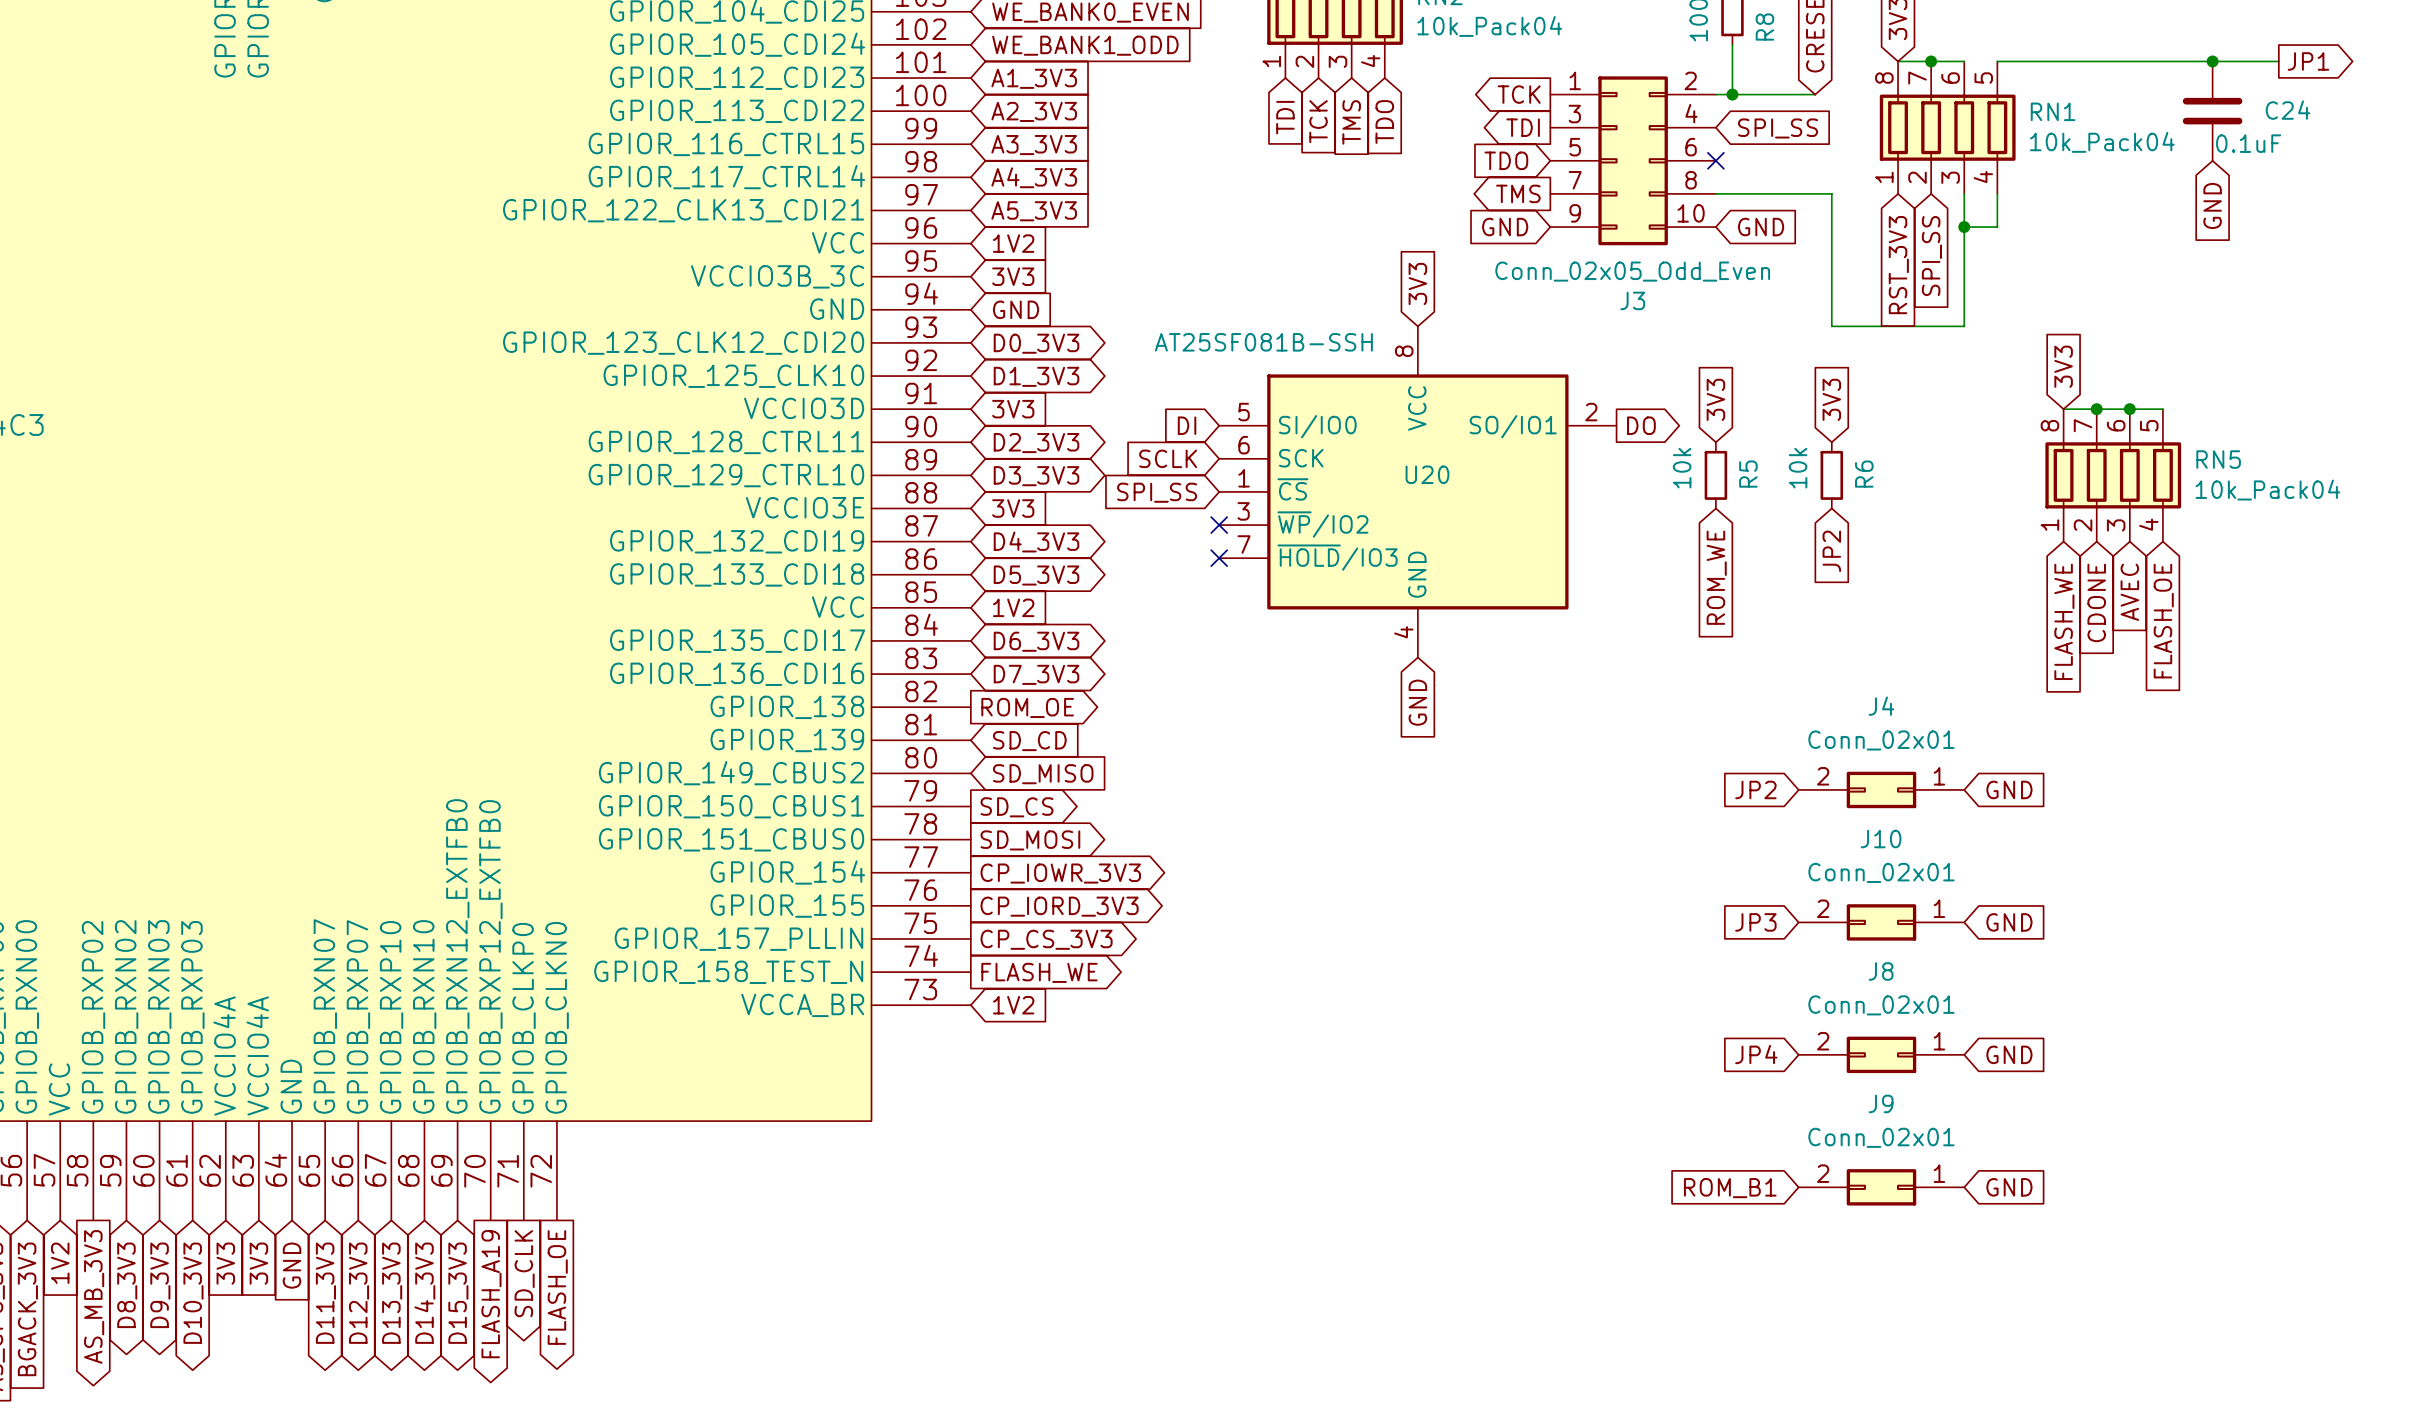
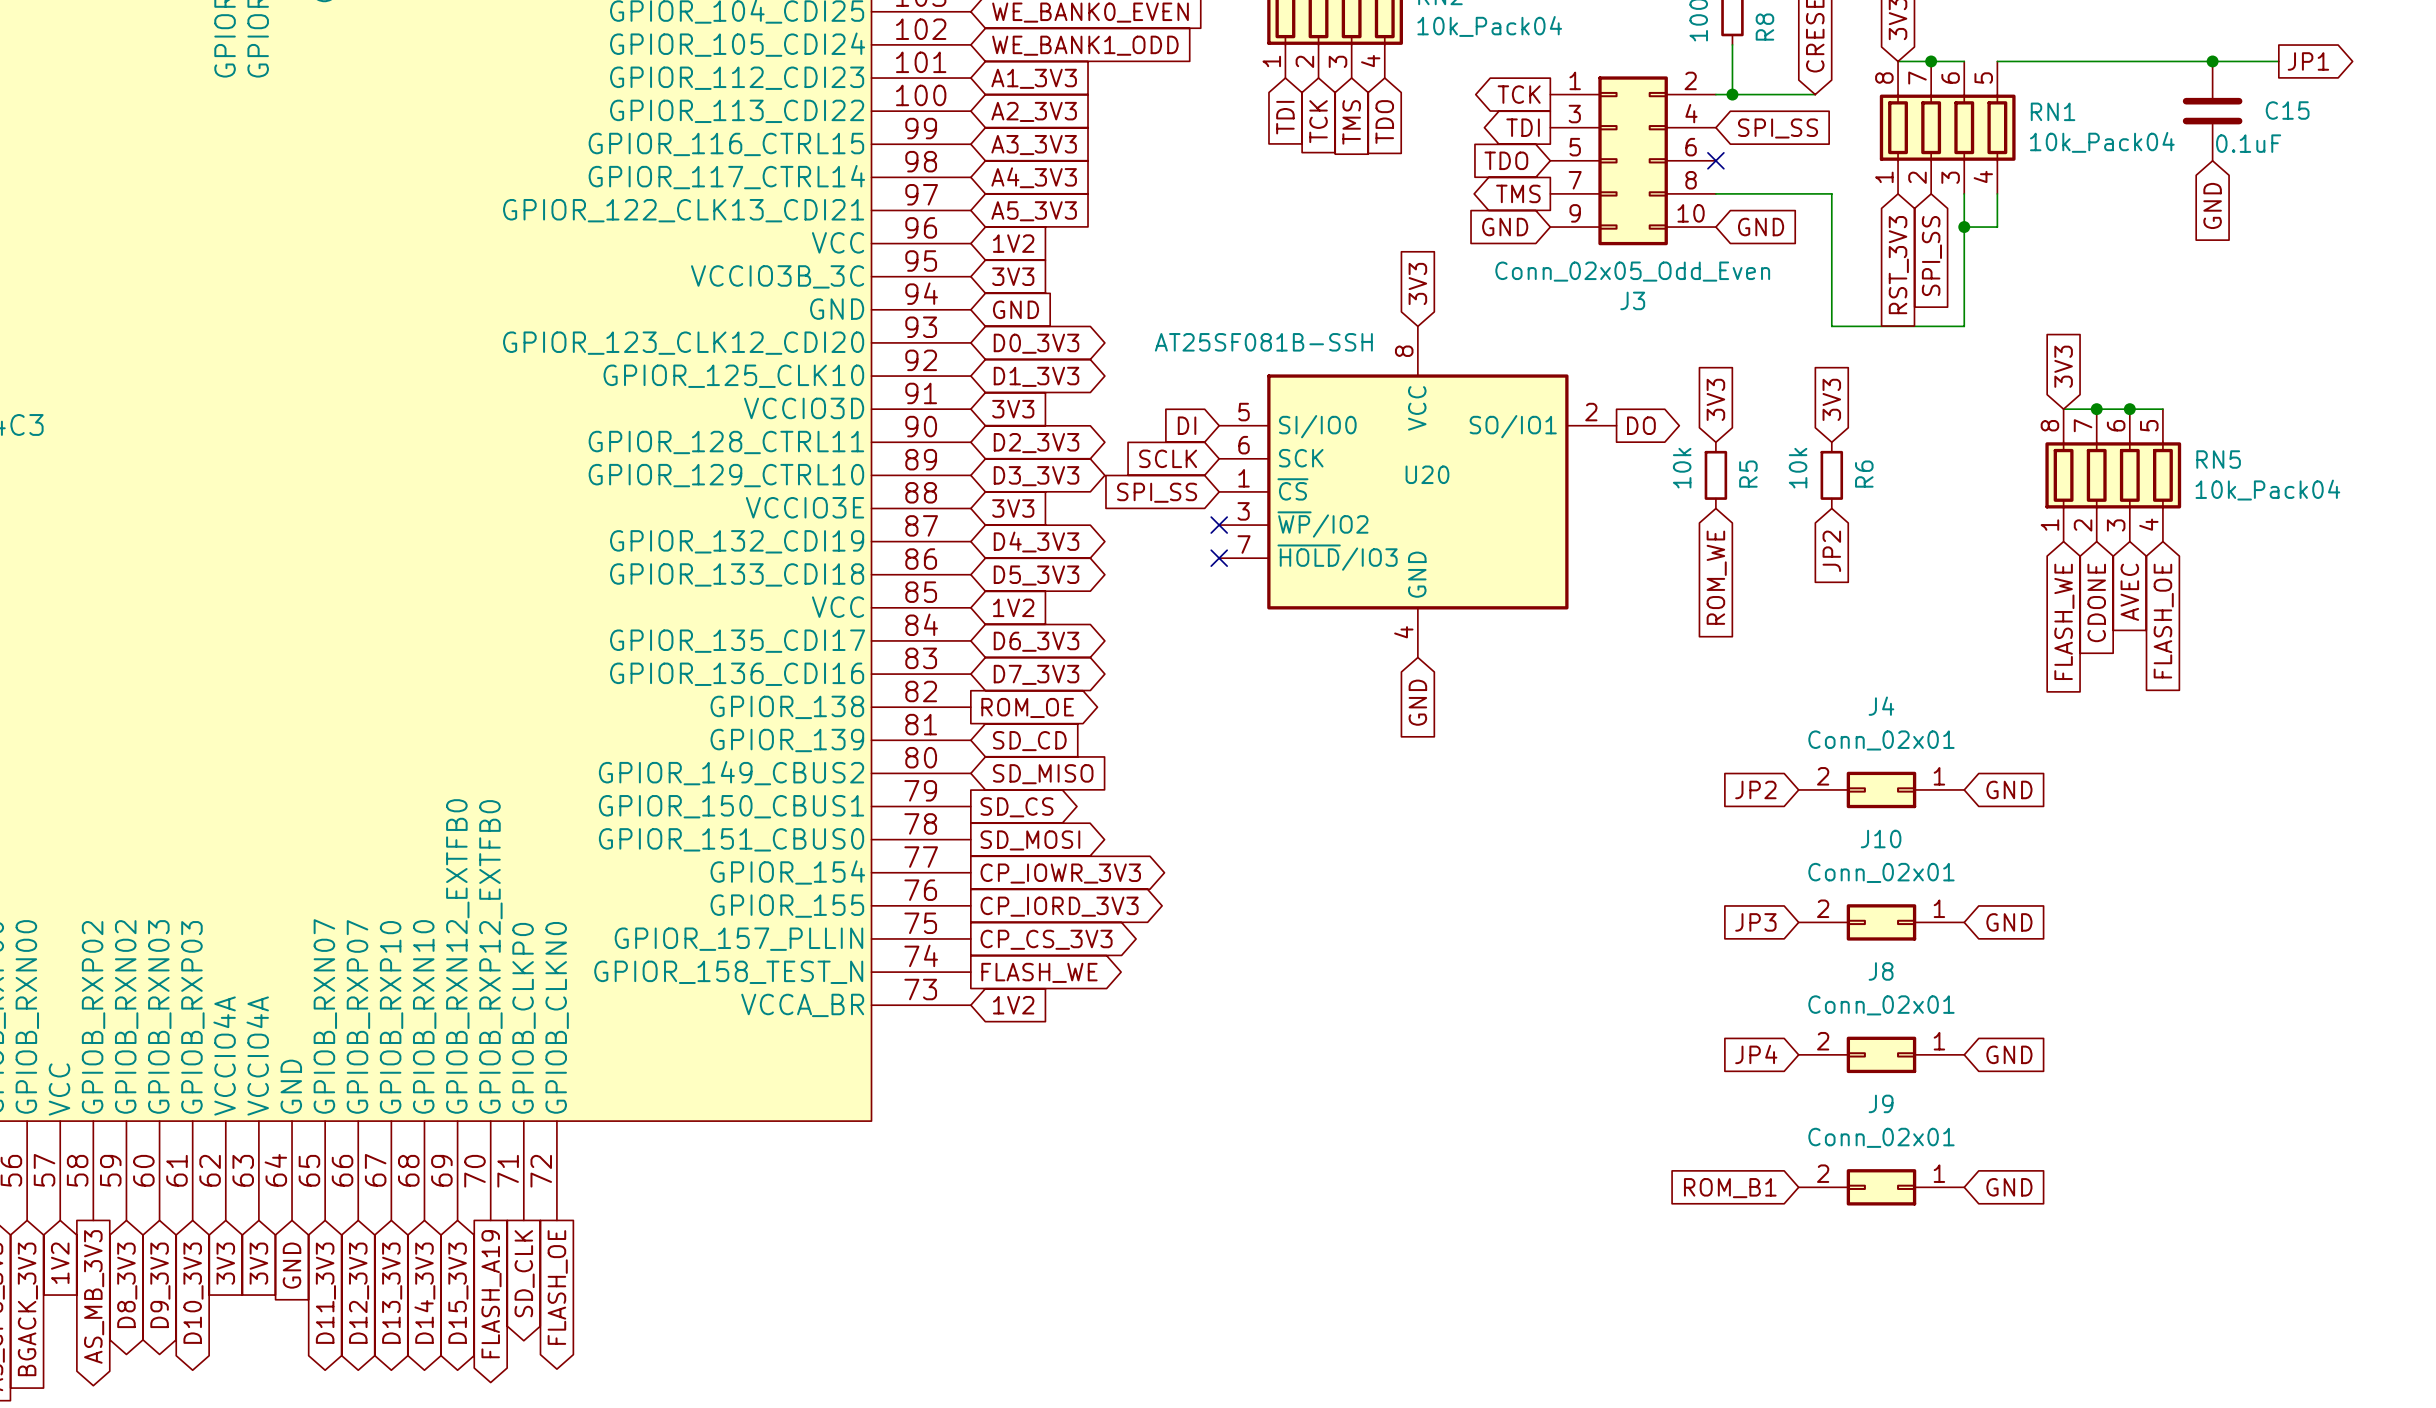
C24 name: C24 (2288, 110) -> C15 (2287, 110)

